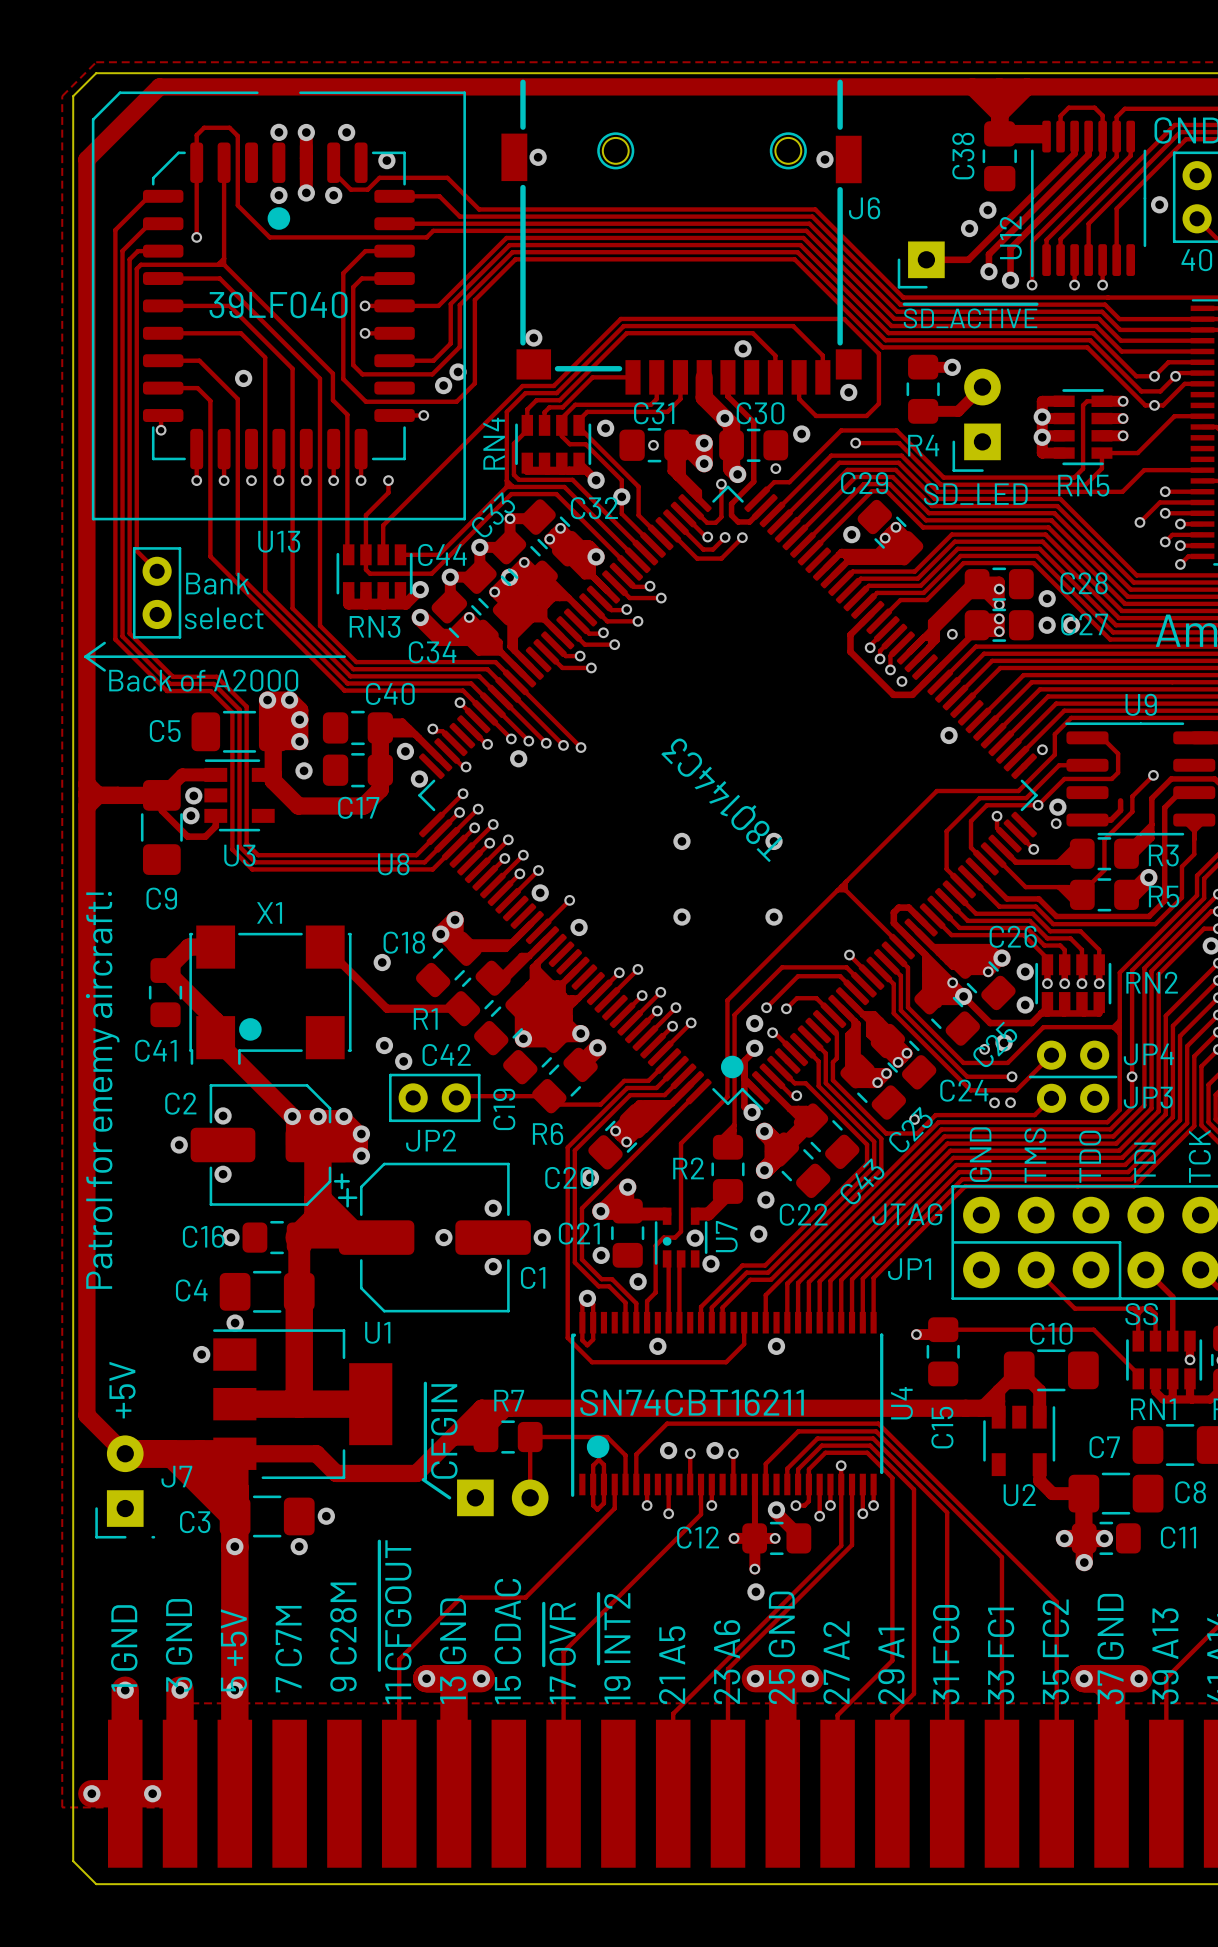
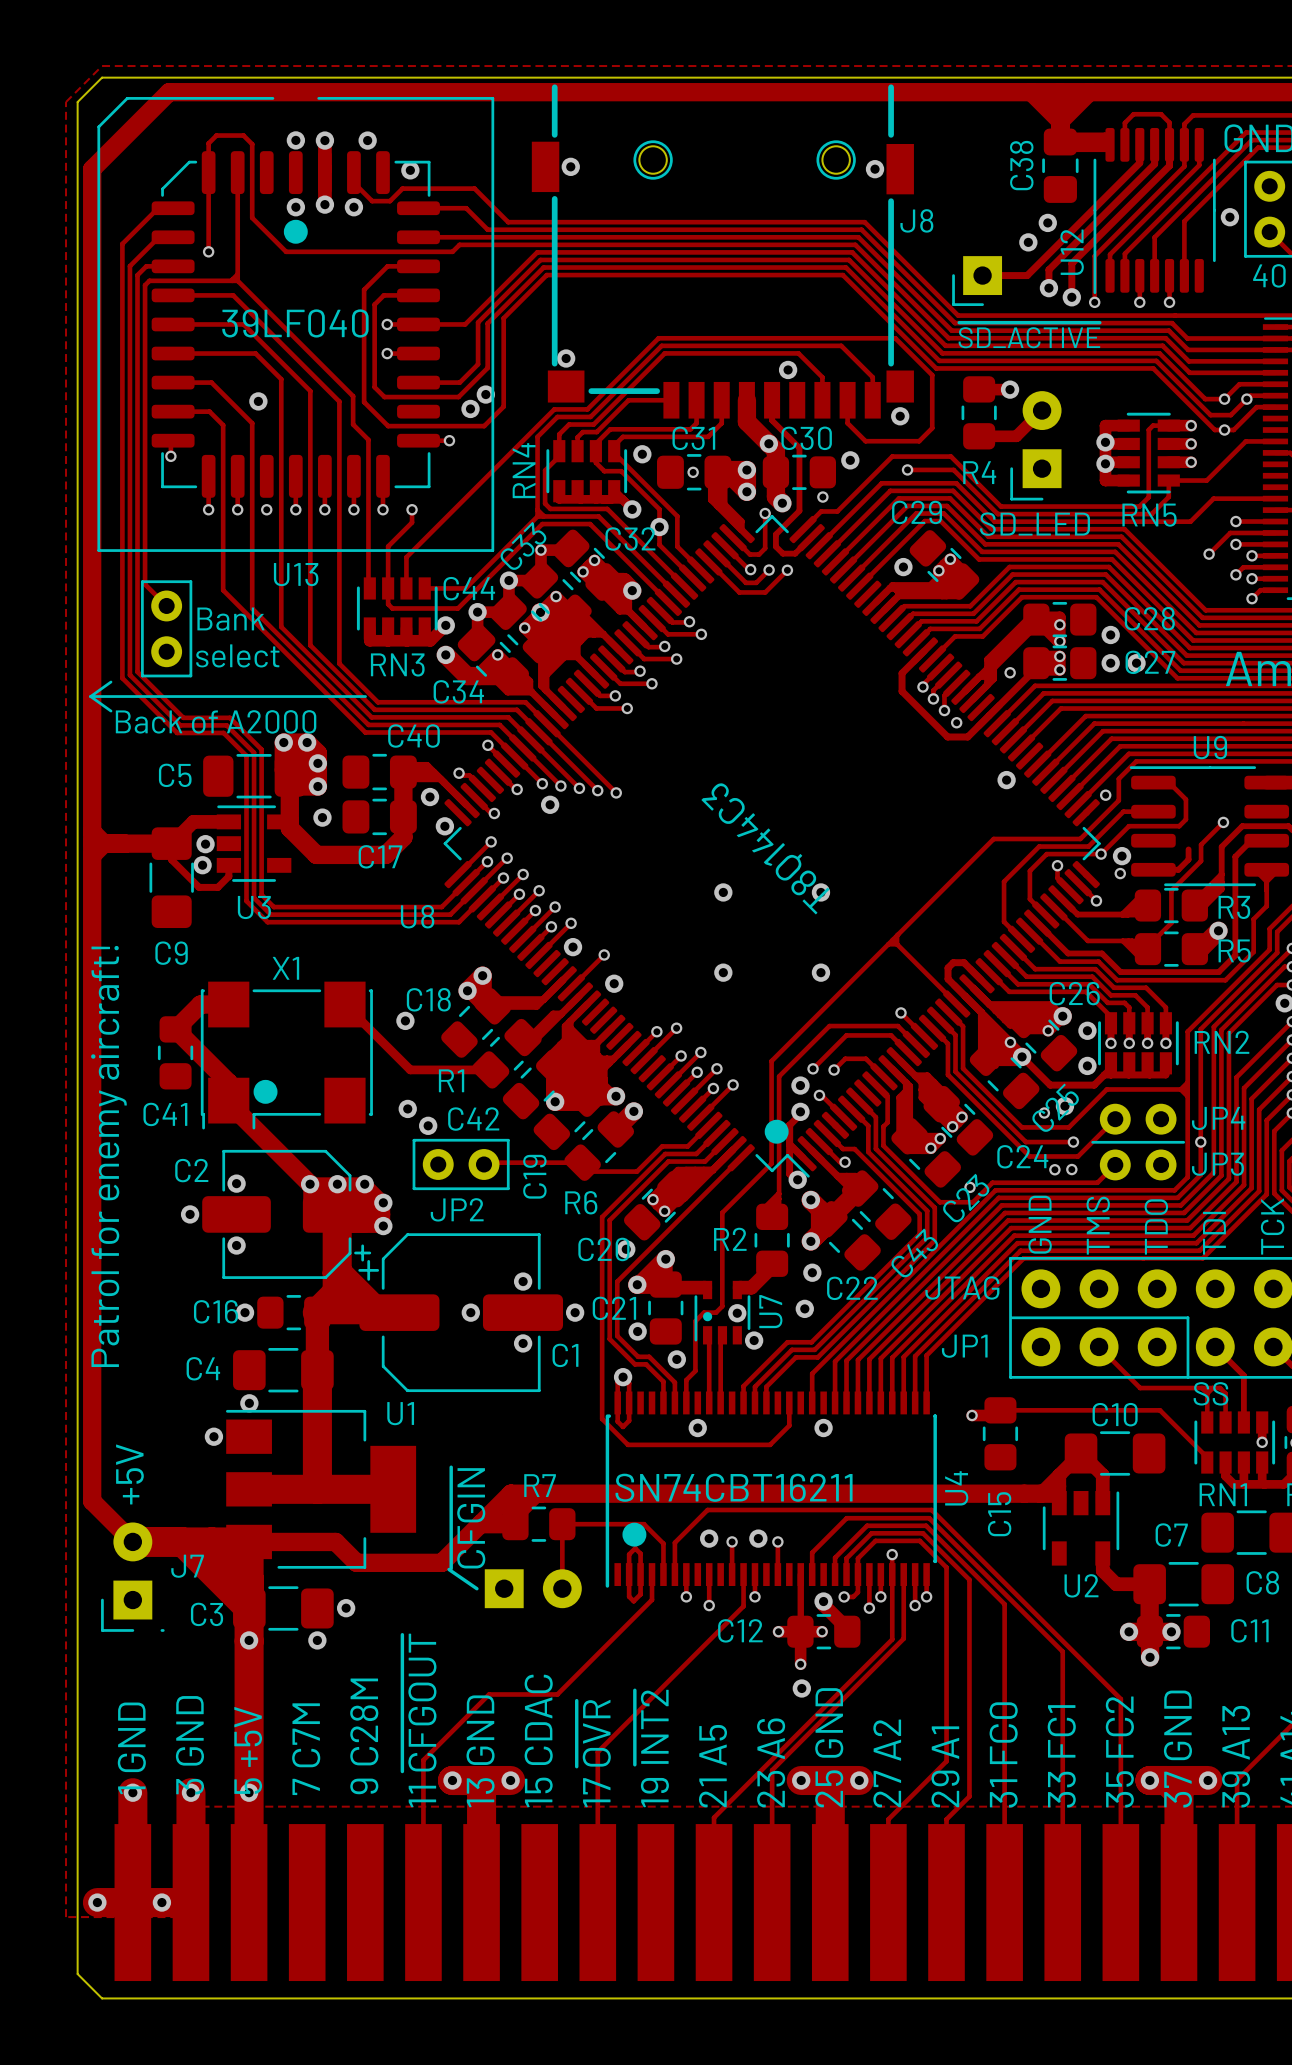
J6 name: J6 (864, 208) -> J8 (916, 220)

